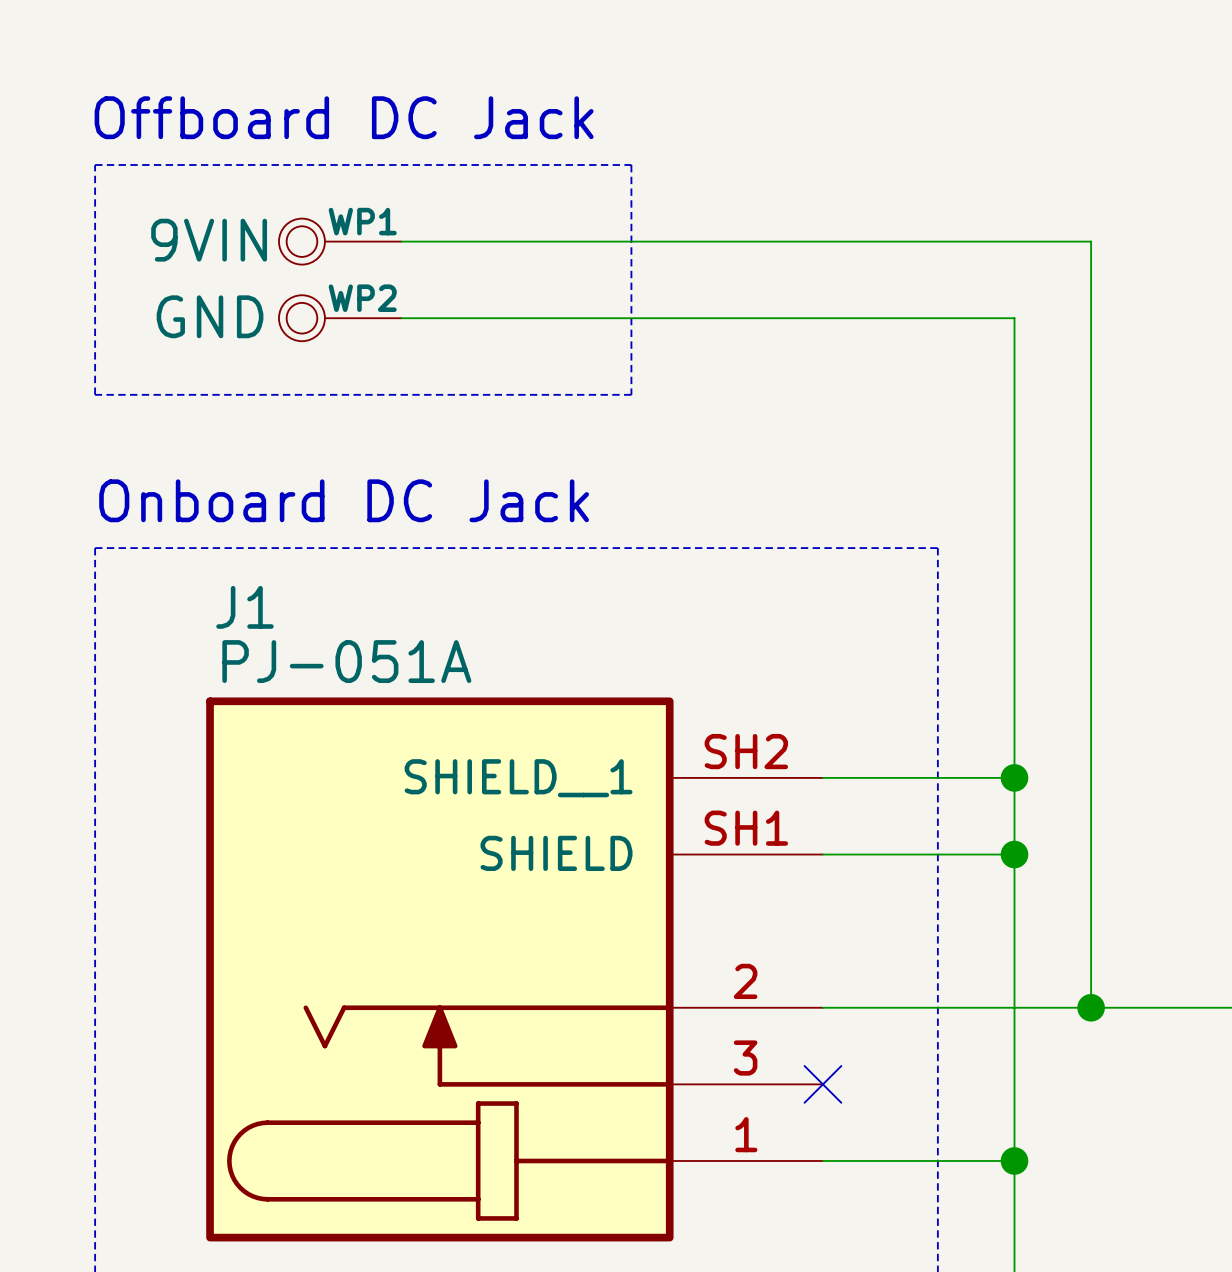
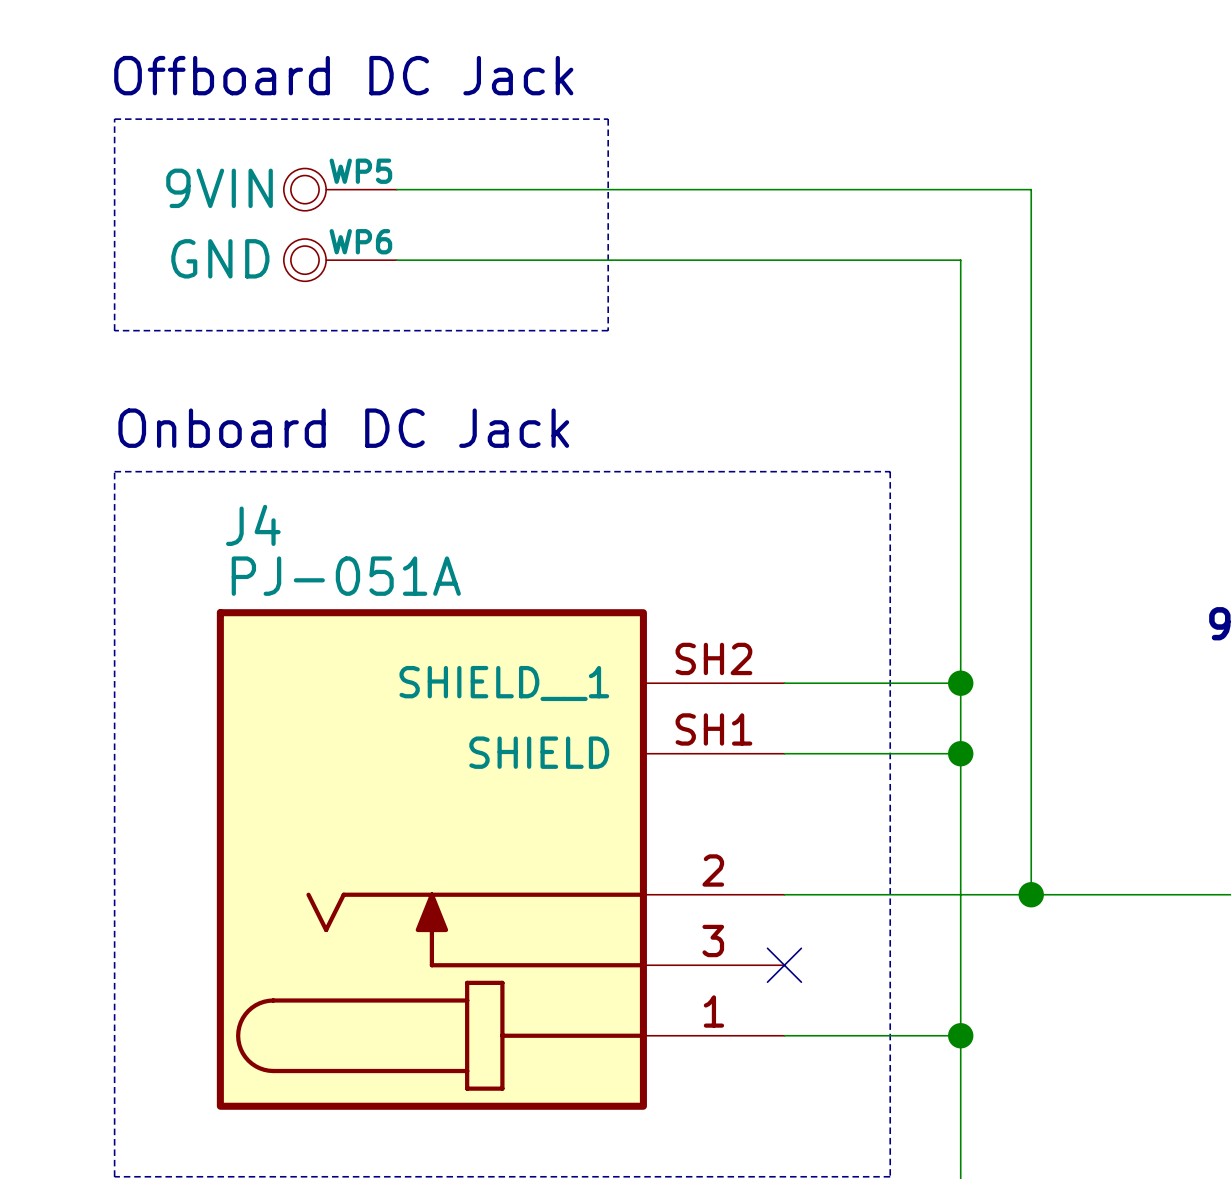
WP1 name: WP1 (362, 221) -> WP5 (360, 171)
WP2 name: WP2 (362, 298) -> WP6 (360, 241)
J1 name: J1 (244, 607) -> J4 (253, 525)

